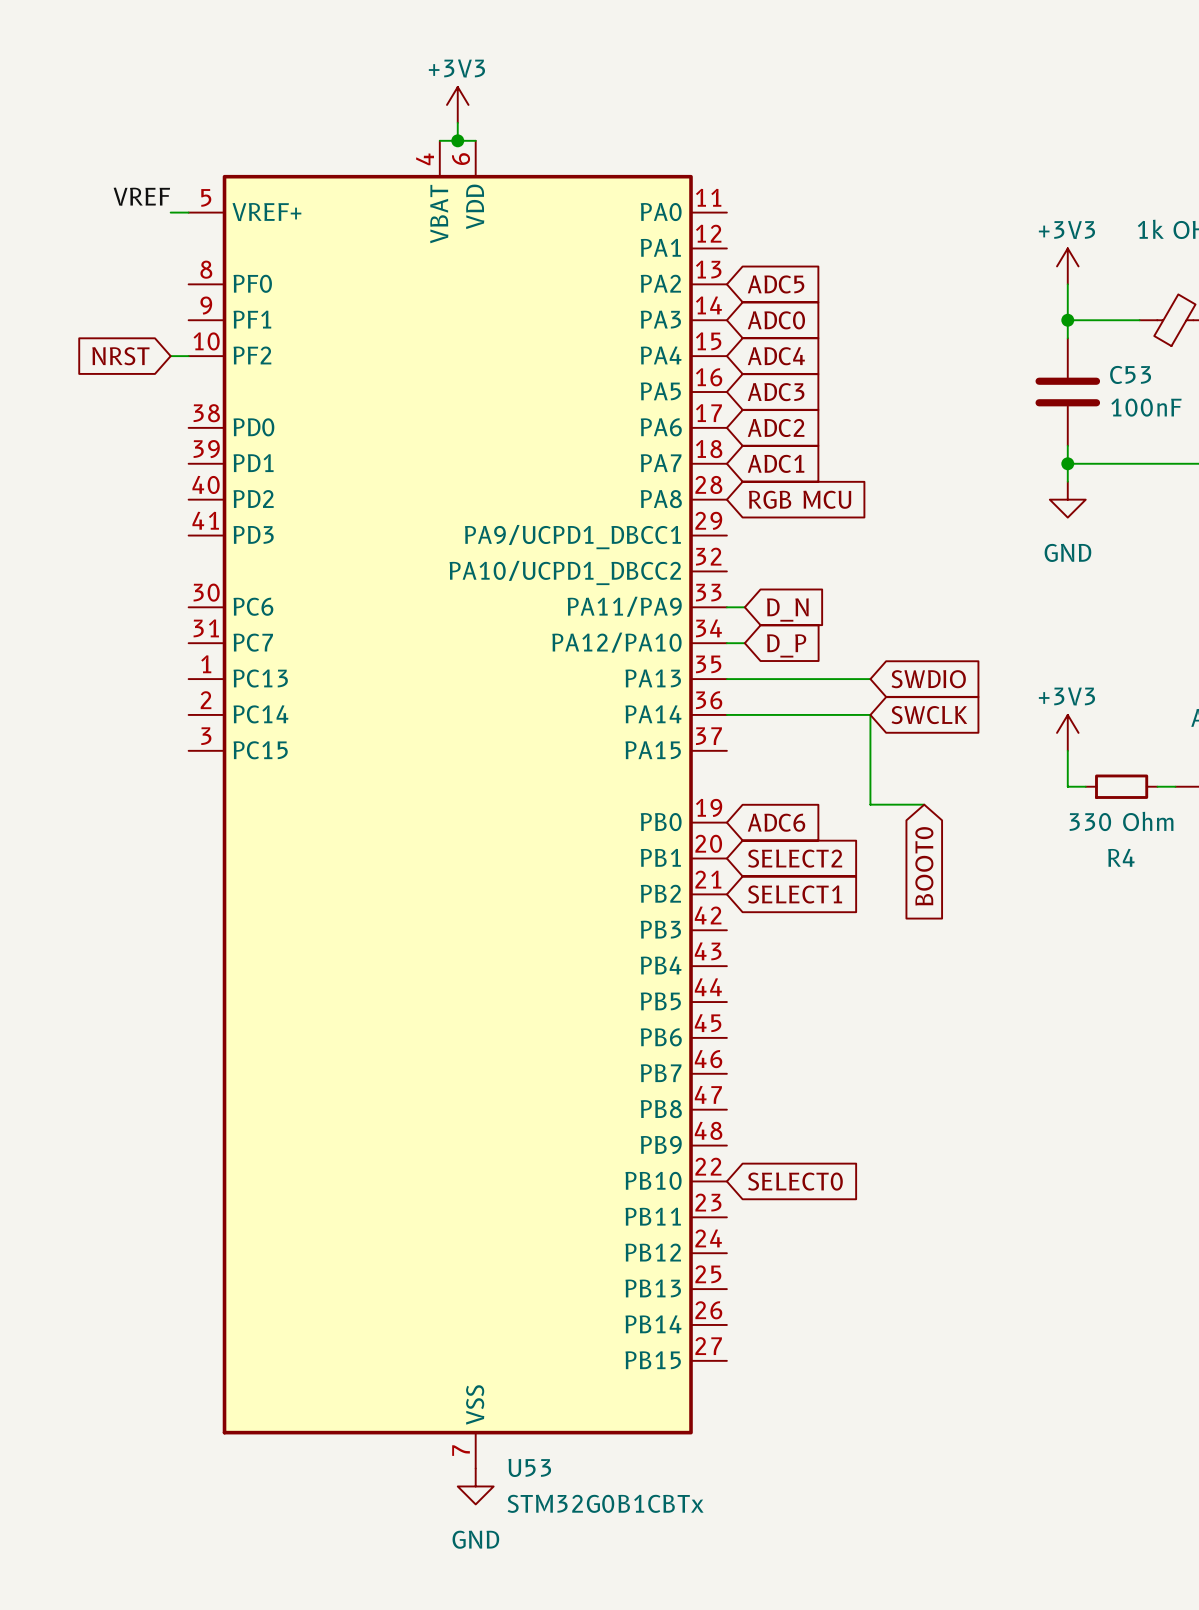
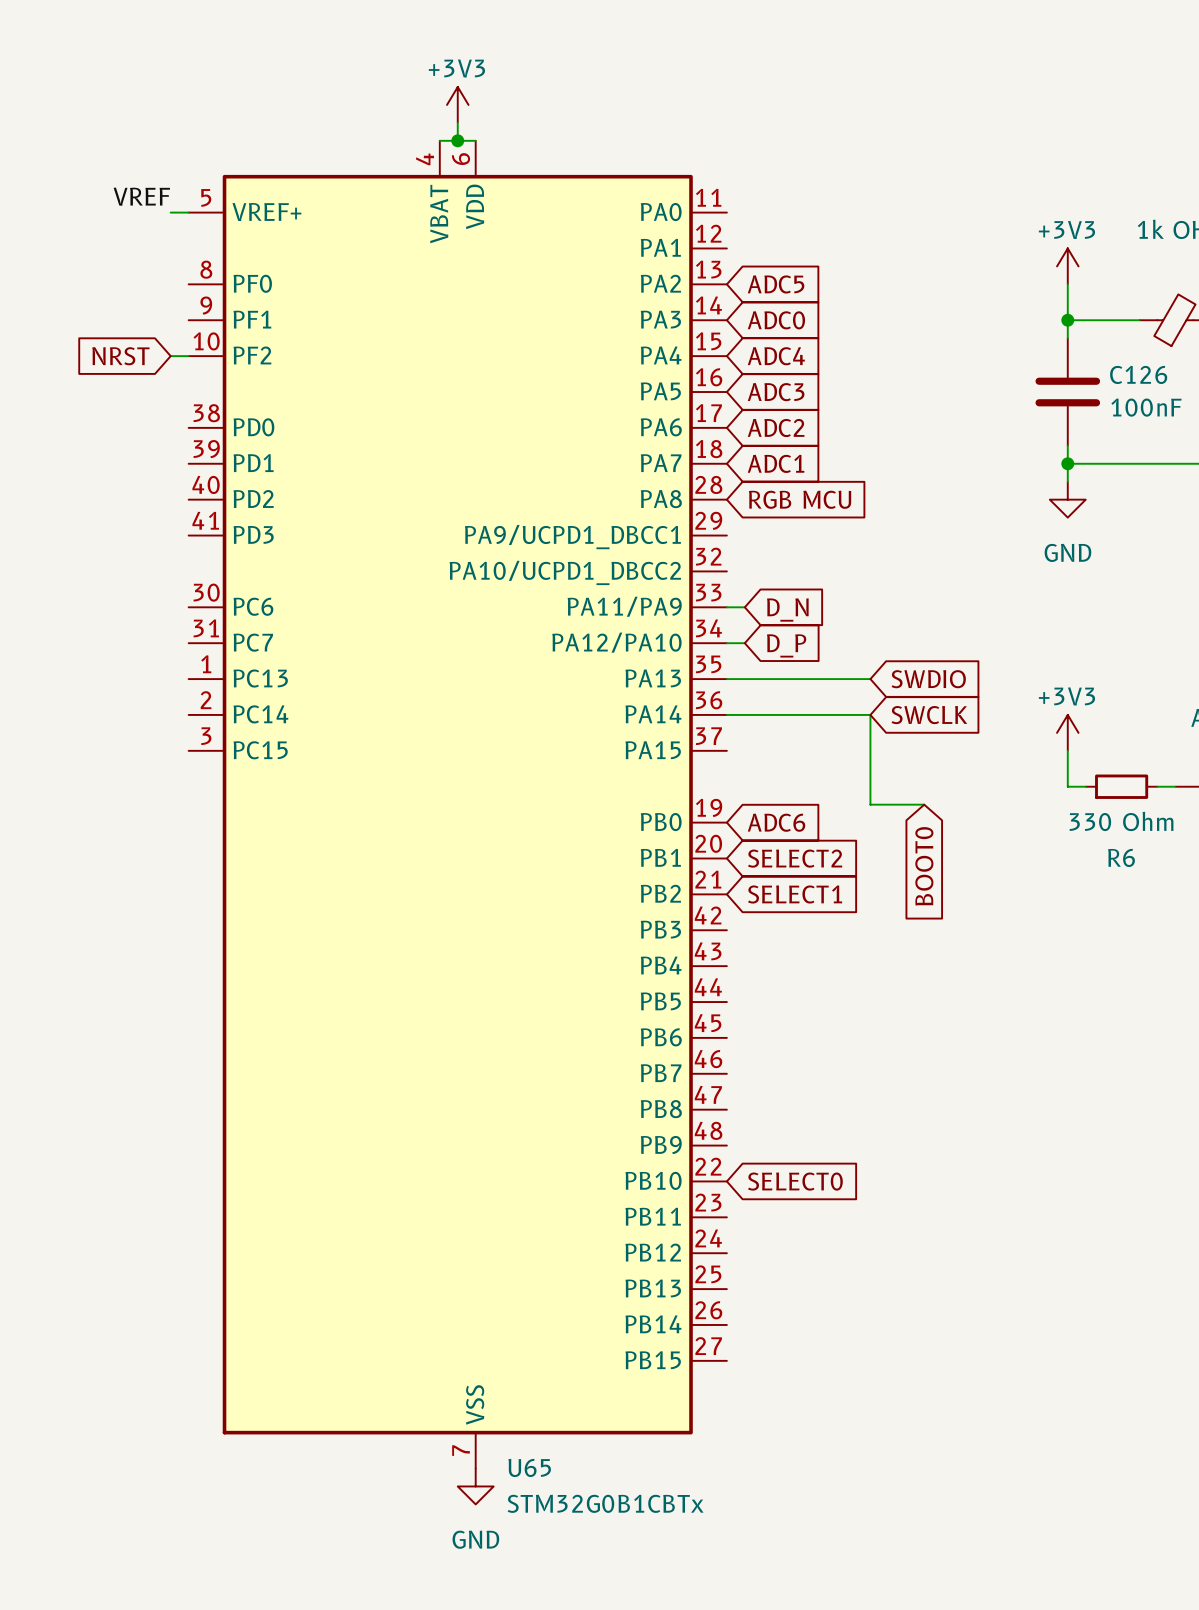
C53 name: C53 (1130, 374) -> C126 (1138, 374)
R4 name: R4 (1121, 857) -> R6 (1121, 857)
U53 name: U53 (529, 1467) -> U65 (529, 1467)

